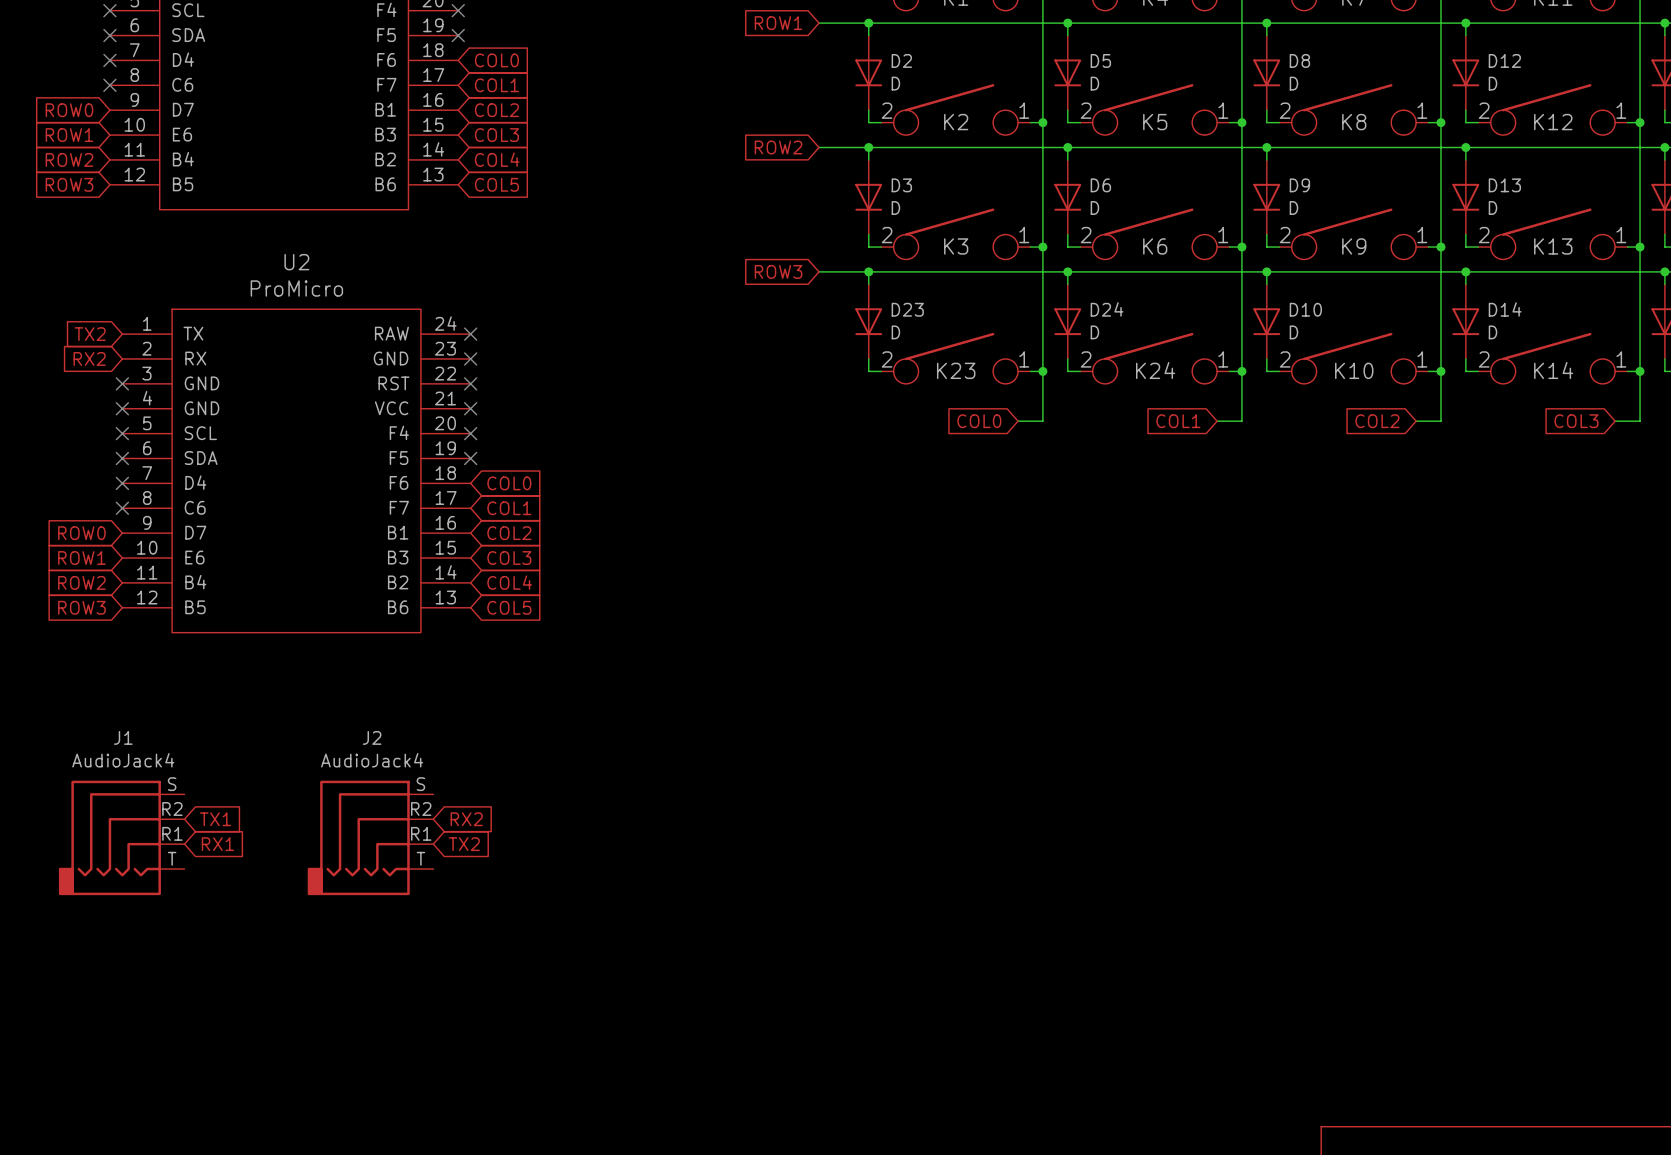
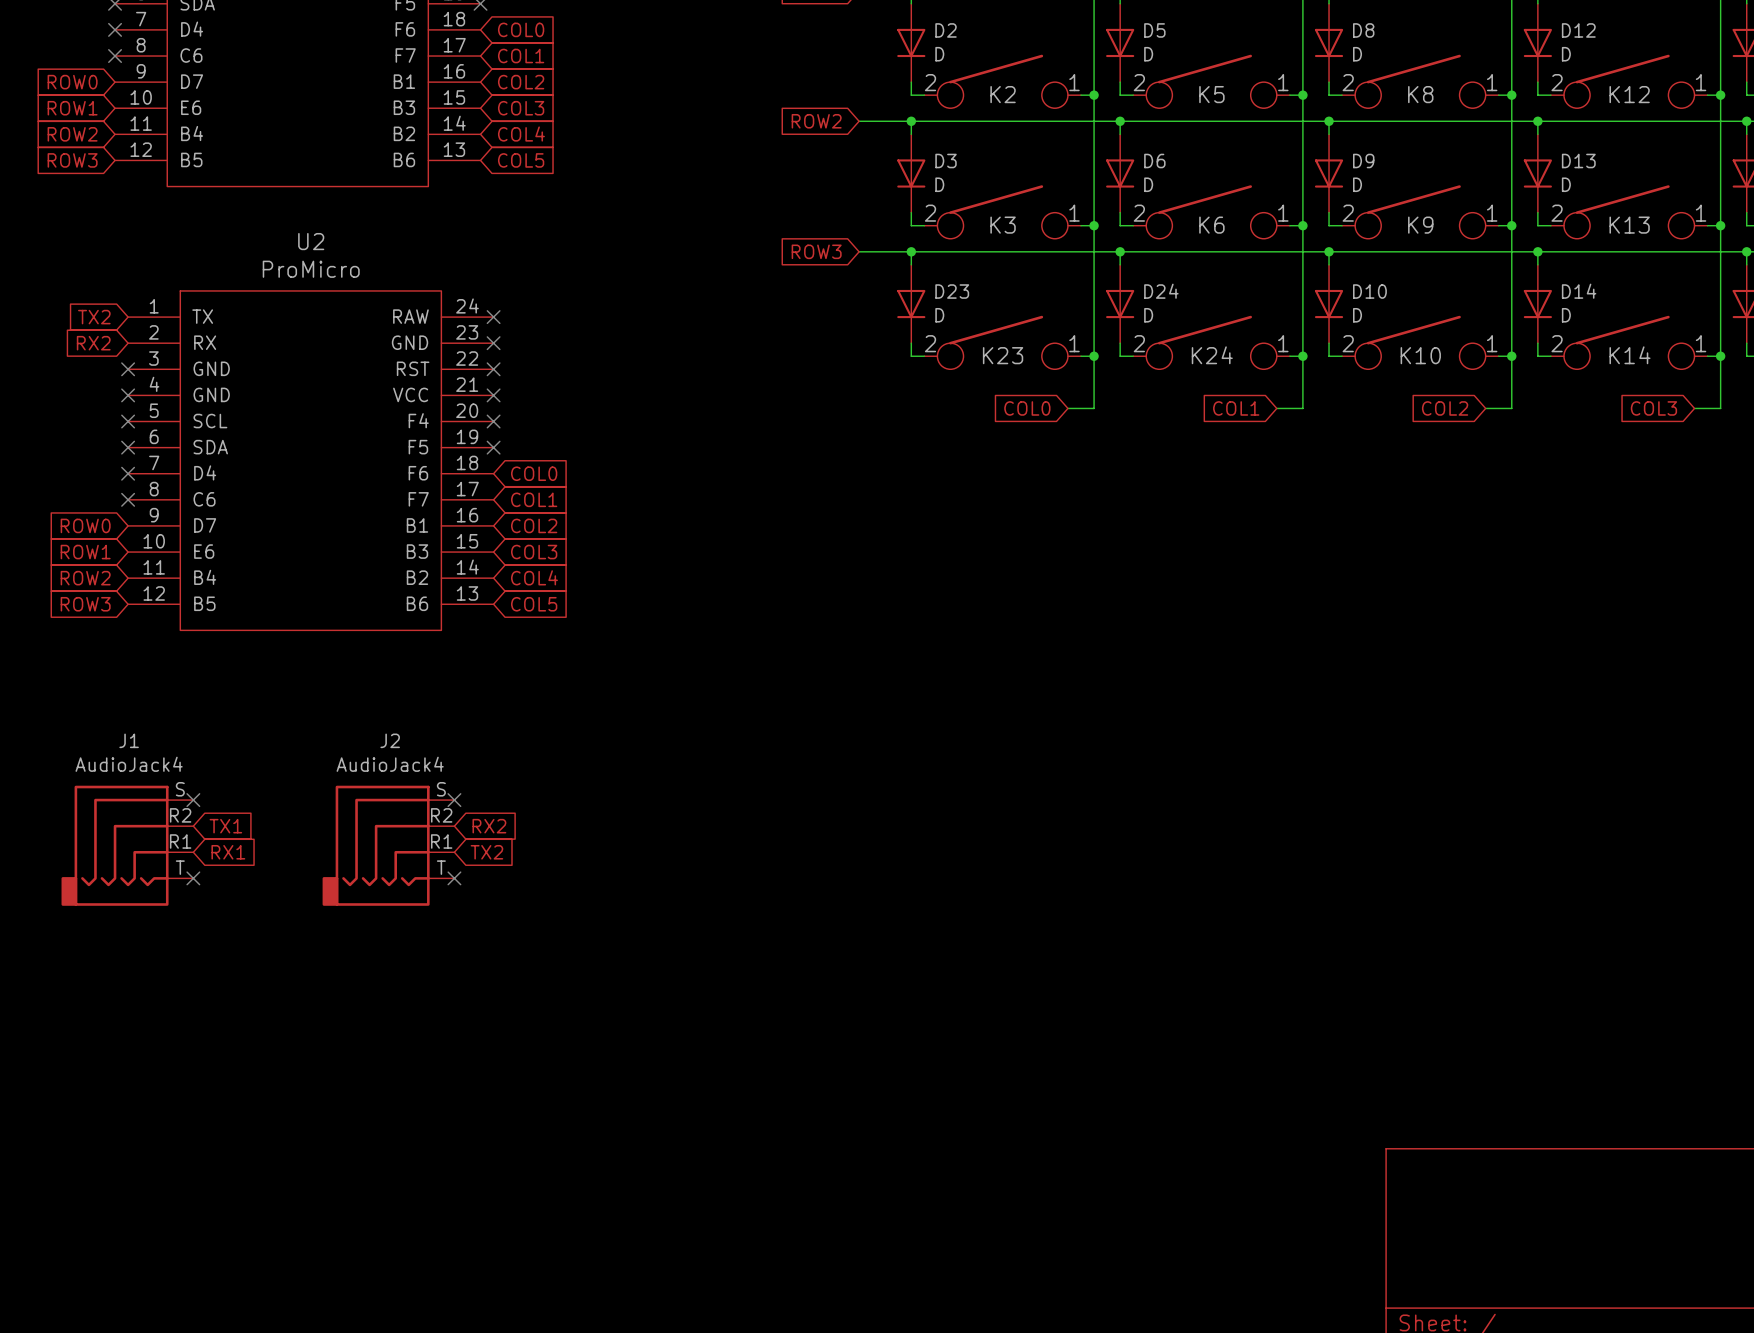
no-connect mark: none -> (193, 800)
no-connect mark: none -> (454, 800)
no-connect mark: none -> (193, 878)
no-connect mark: none -> (454, 878)

